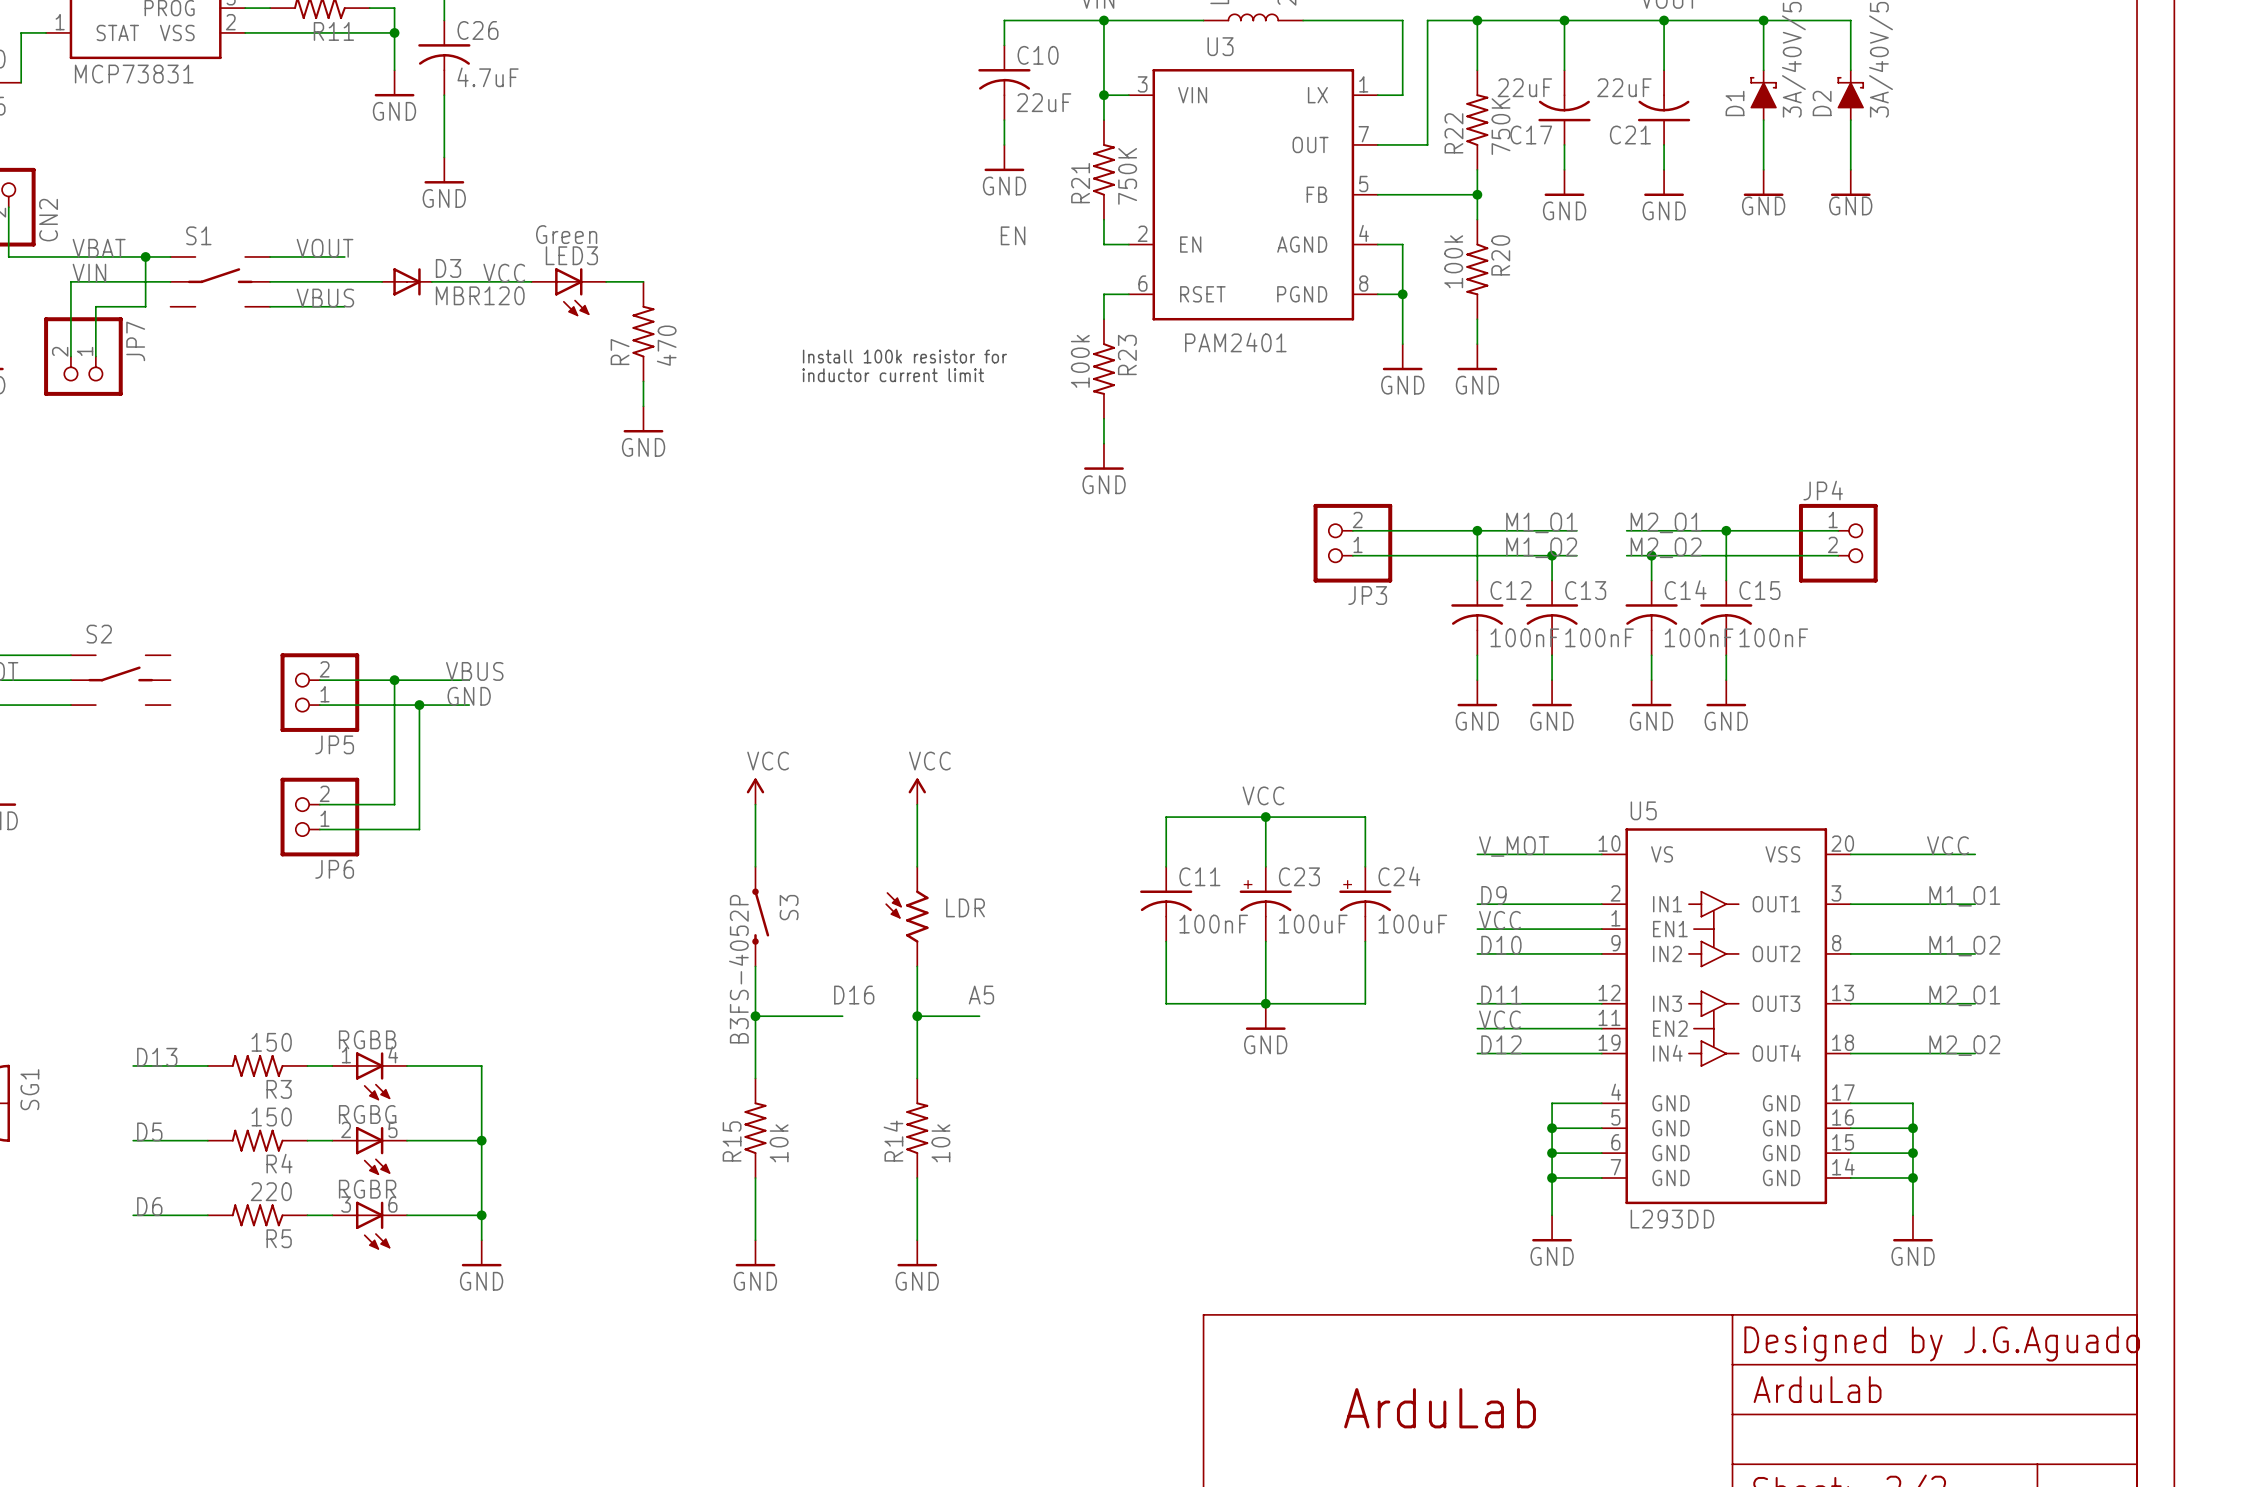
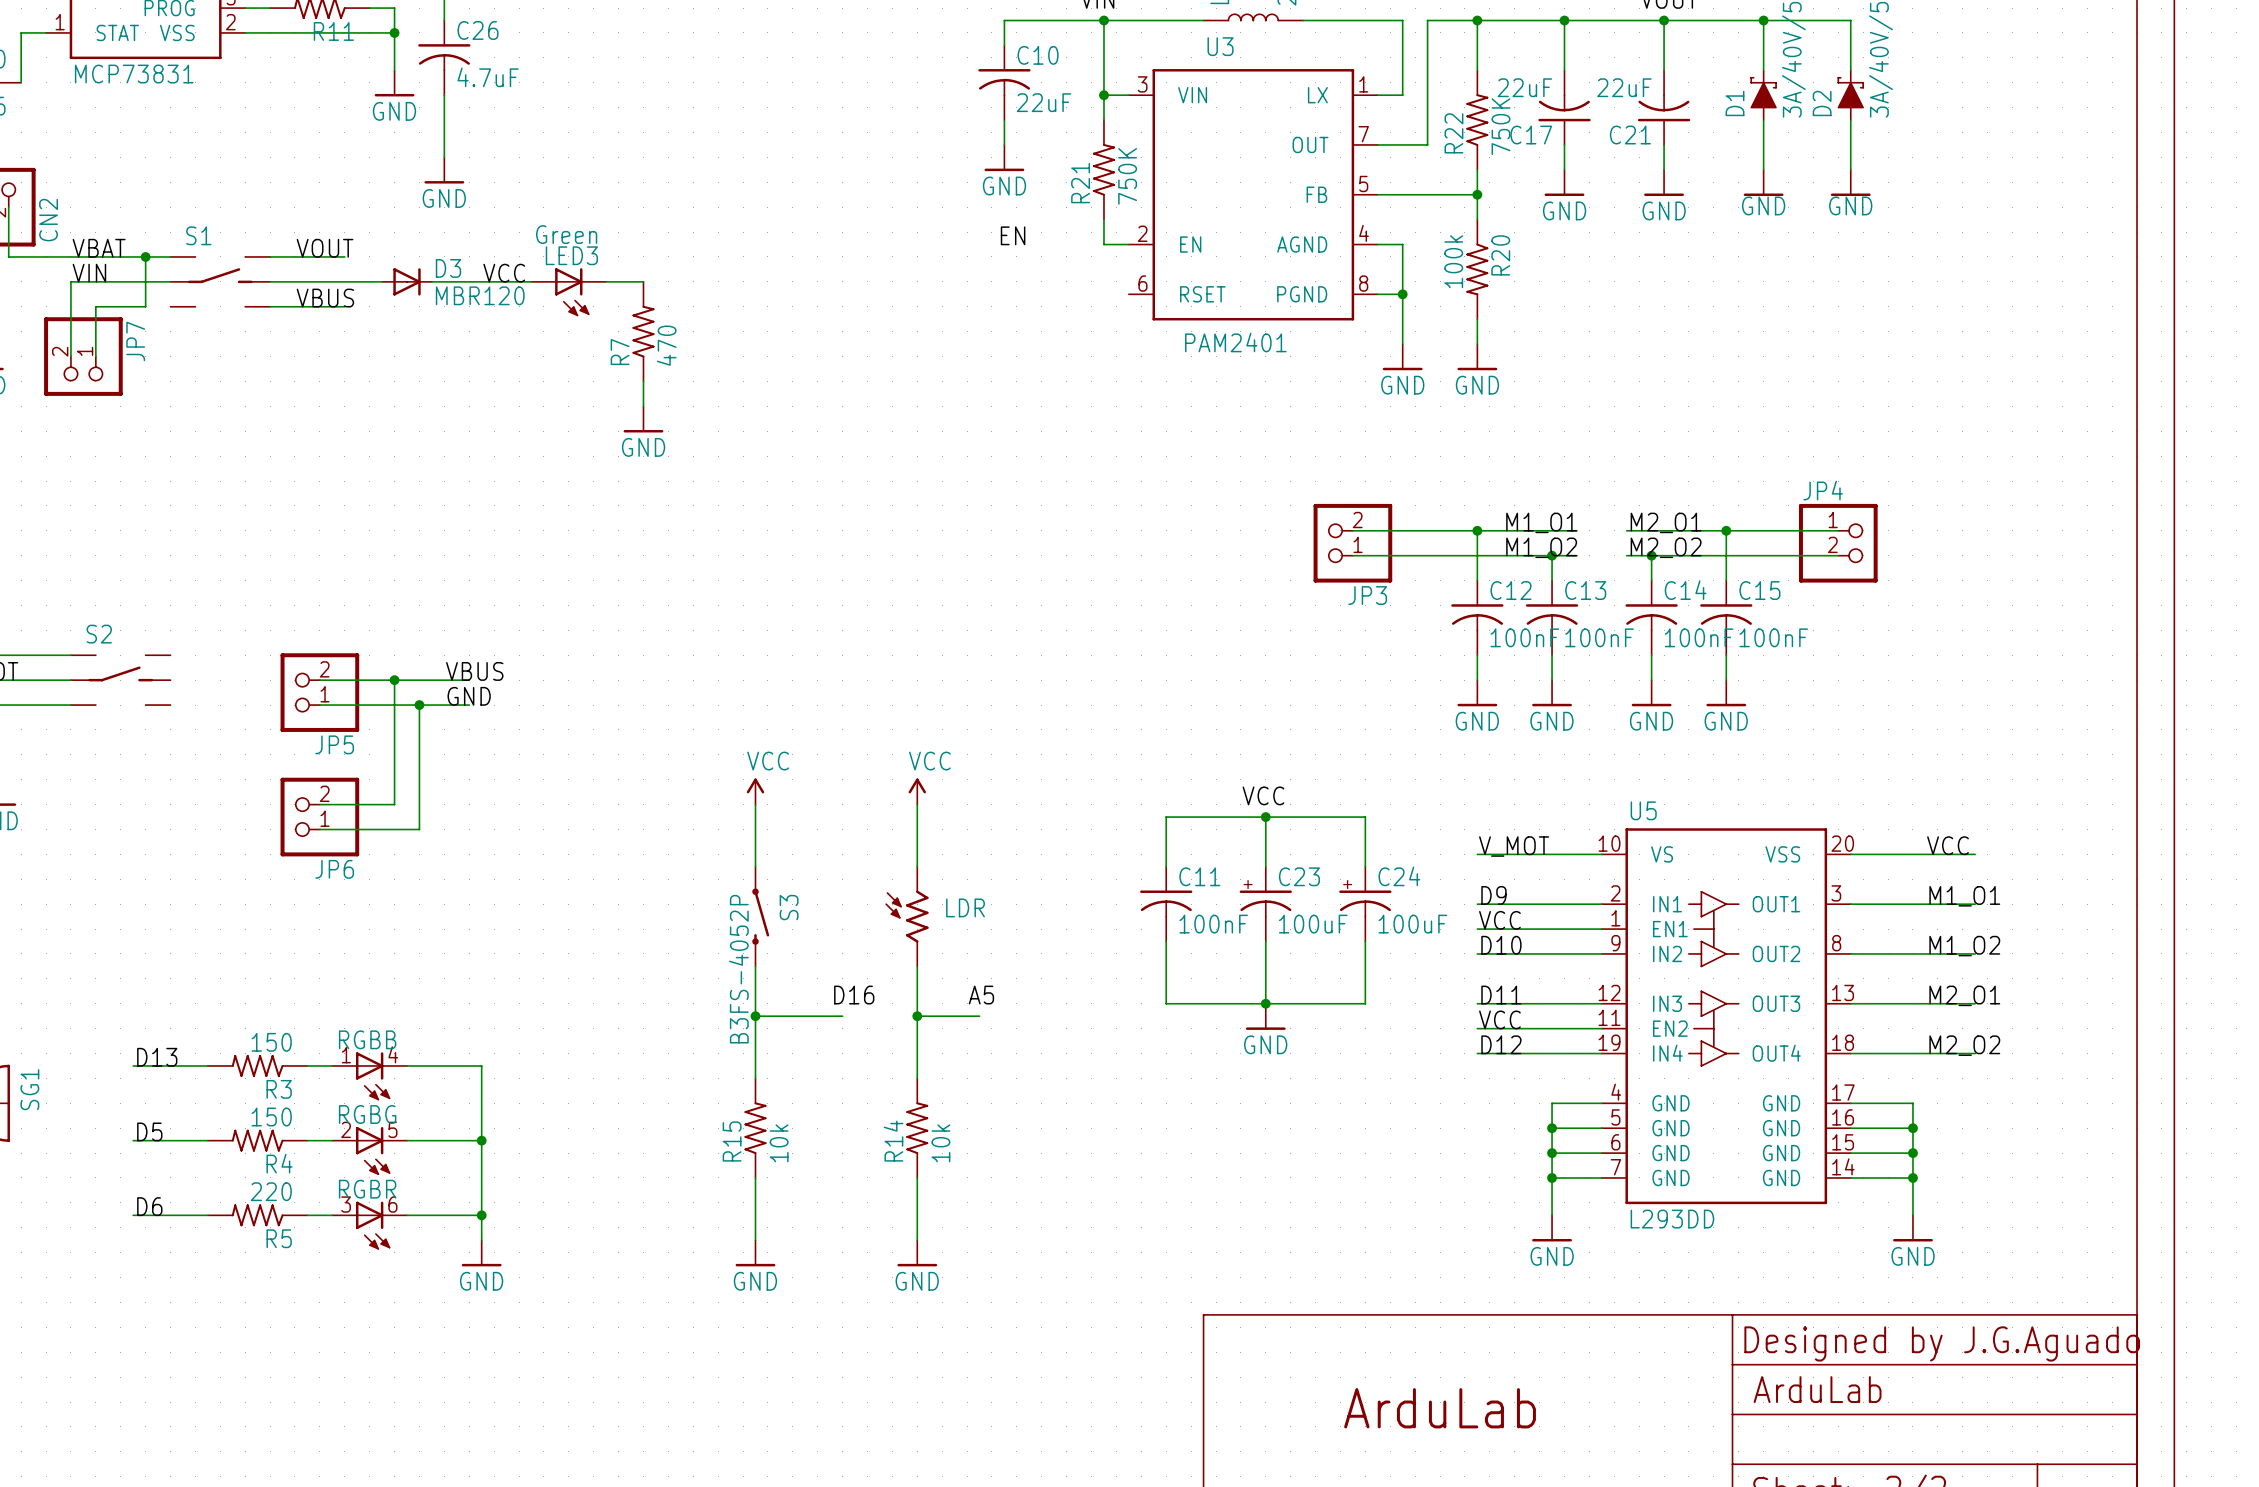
wire: (1128, 294) (1103, 294) (1103, 319) -> none
text: Install 100k resistor for (904, 356) -> none
R23: 100k (1103, 369) -> none
text: inductor current limit (893, 375) -> none
wire: (1103, 418) (1103, 443) -> none
power symbol: GND (1103, 456) -> none

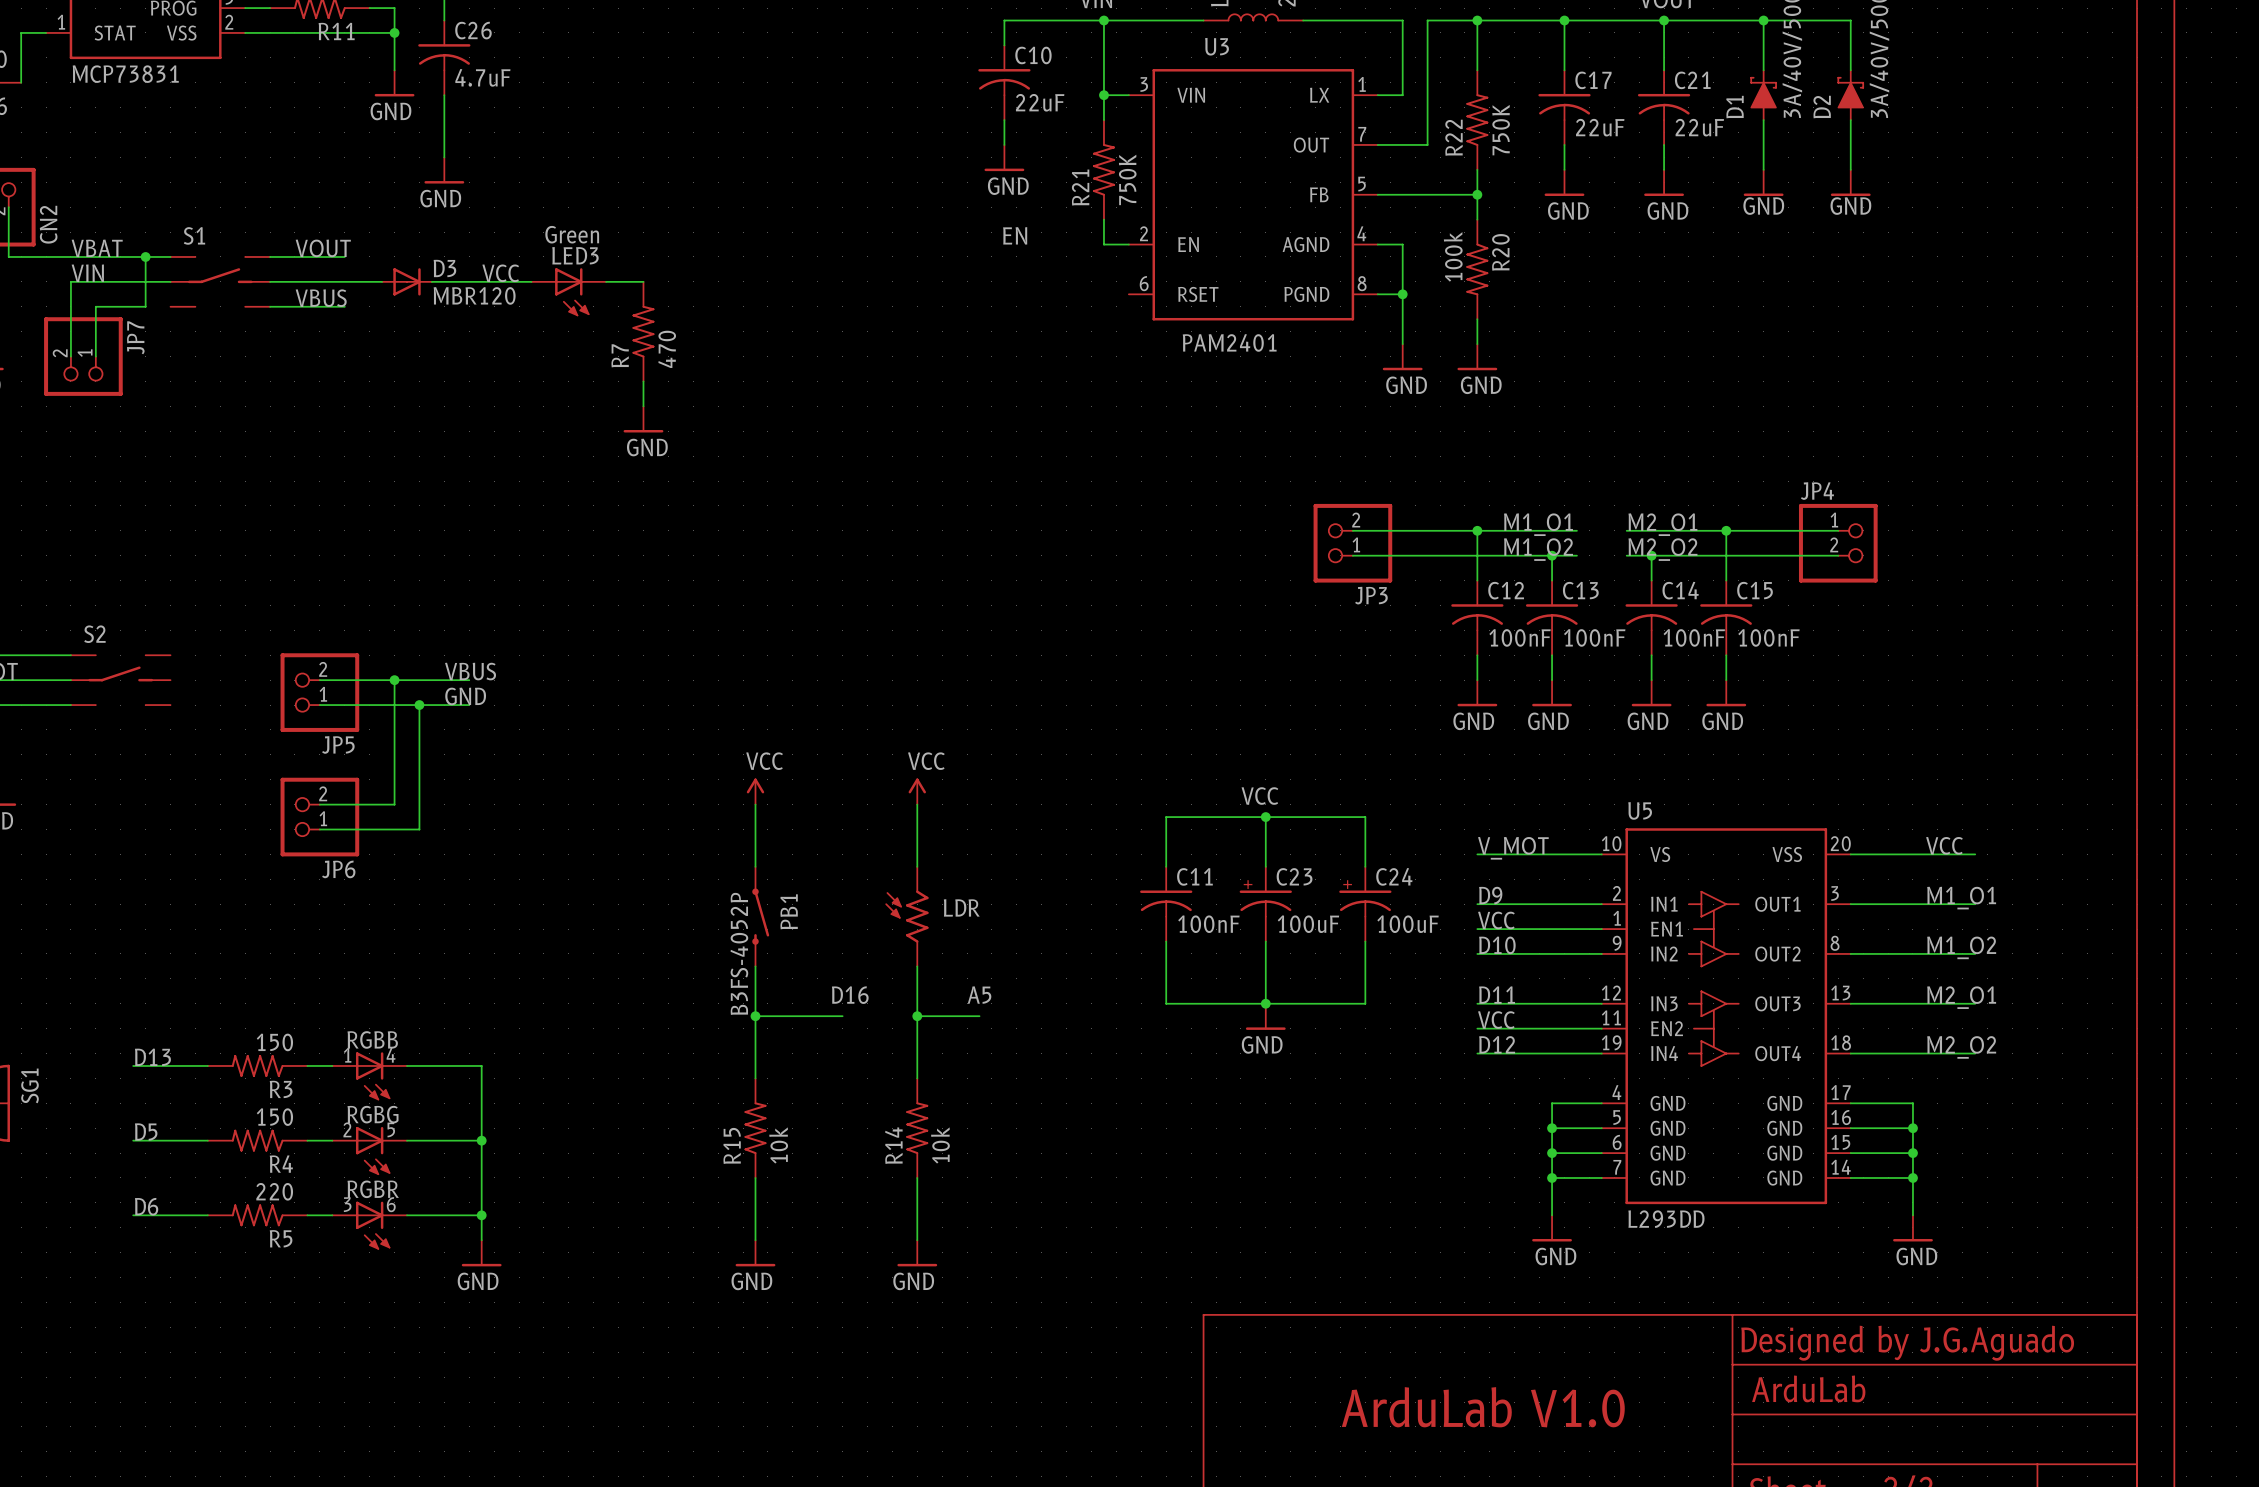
C17 rotation: 0° (1564, 107) -> 180° (1564, 107)
C21 rotation: 0° (1664, 107) -> 180° (1664, 107)
S3 name: S3 (789, 907) -> PB1 (789, 911)
text: ArduLab (1440, 1408) -> ArduLab V1.0 (1483, 1407)

